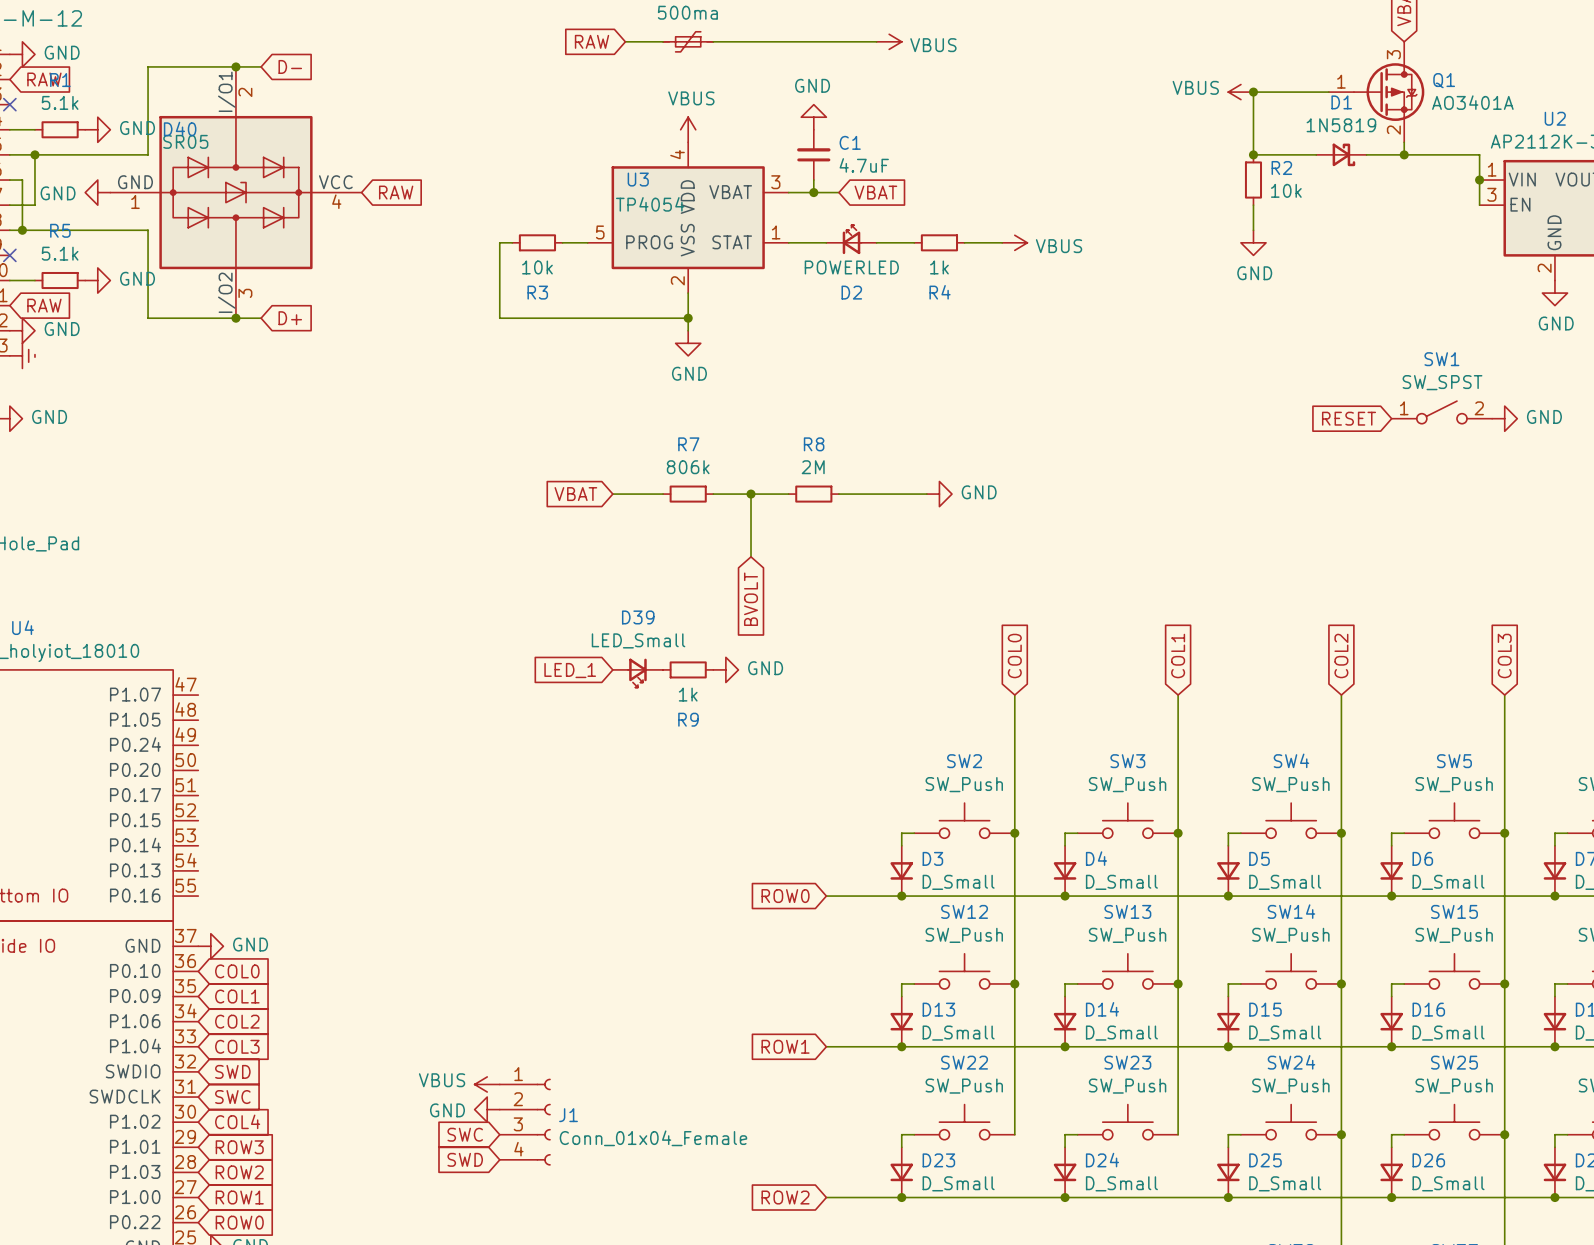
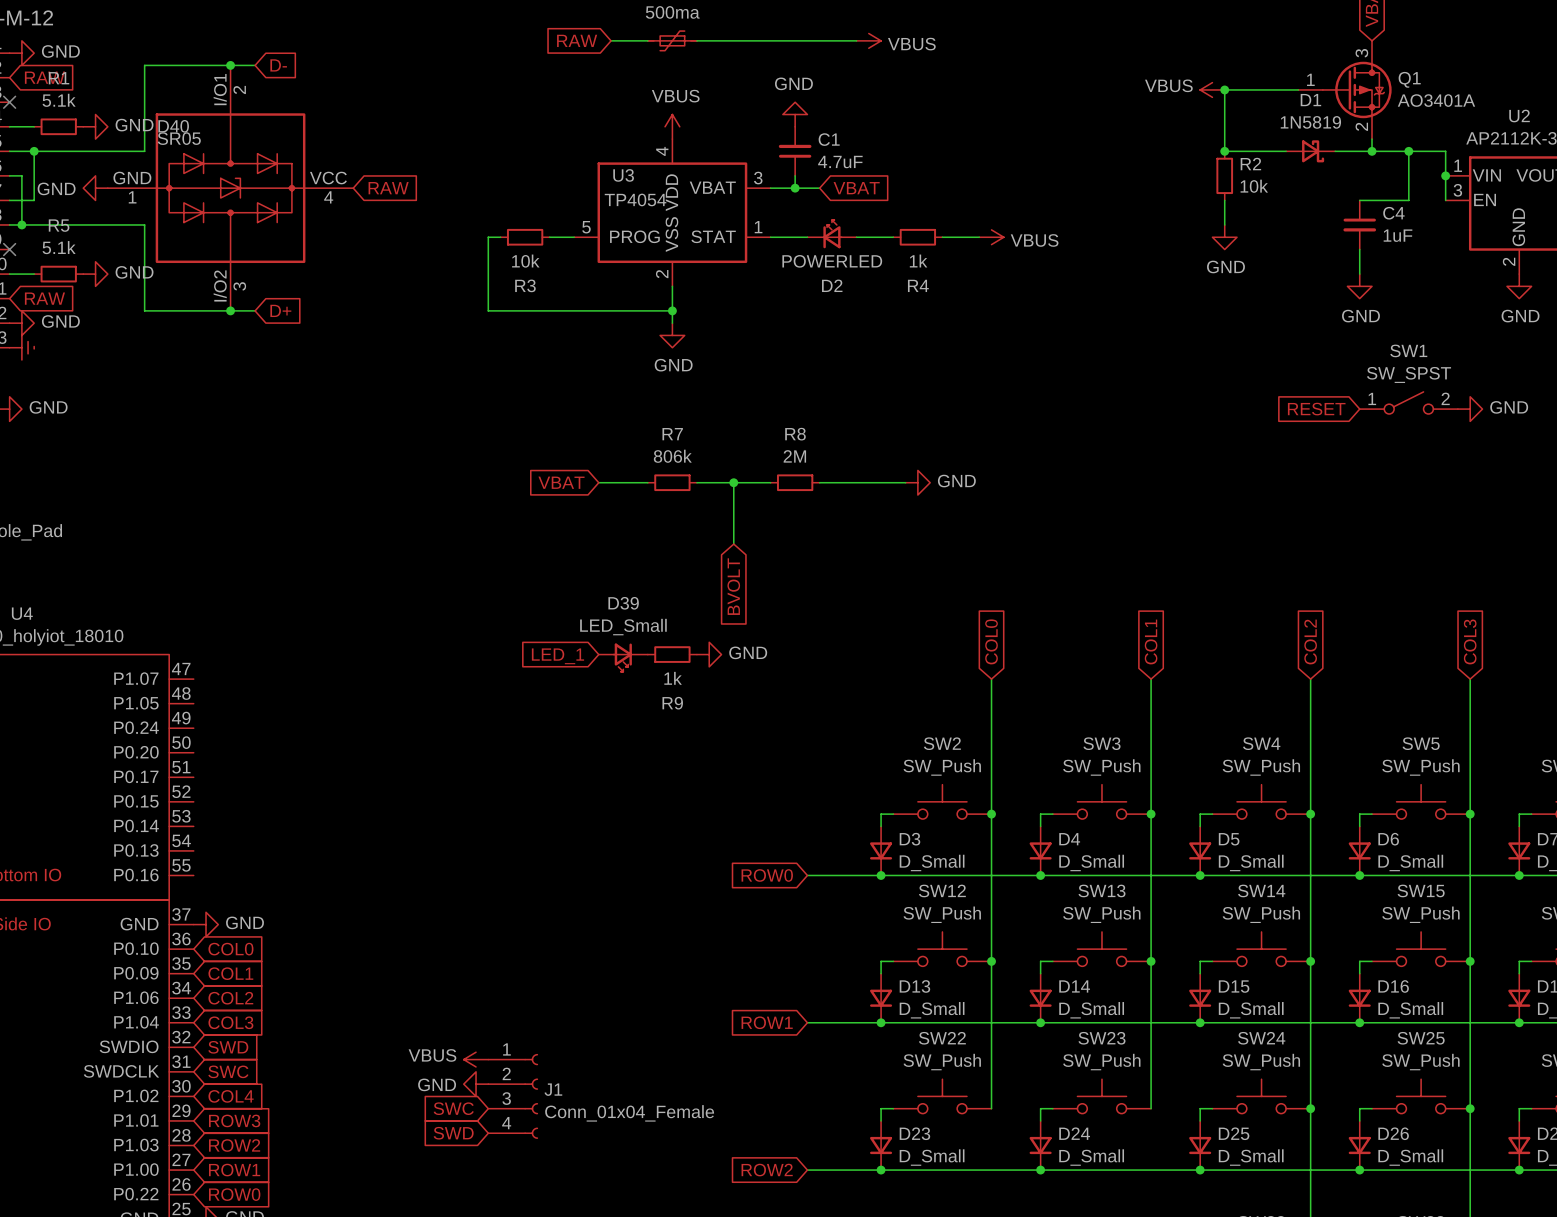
wire: none -> (1408, 151) (1408, 200) (1359, 200)
junction: none -> (1408, 151)
C4: none -> 1uF (1359, 224)
wire: none -> (1359, 249) (1359, 274)
power symbol: none -> GND (1359, 286)

